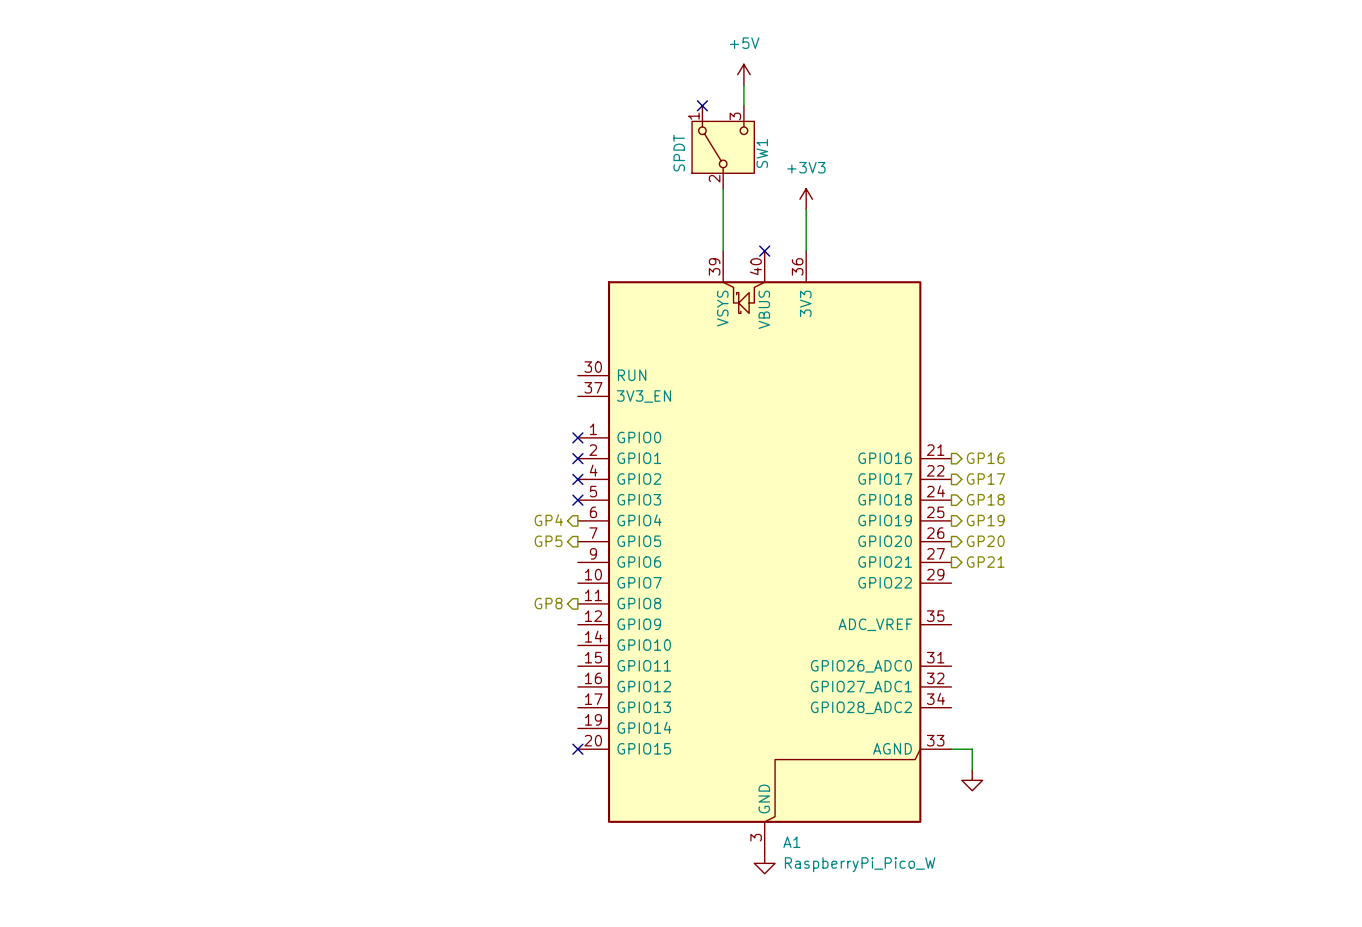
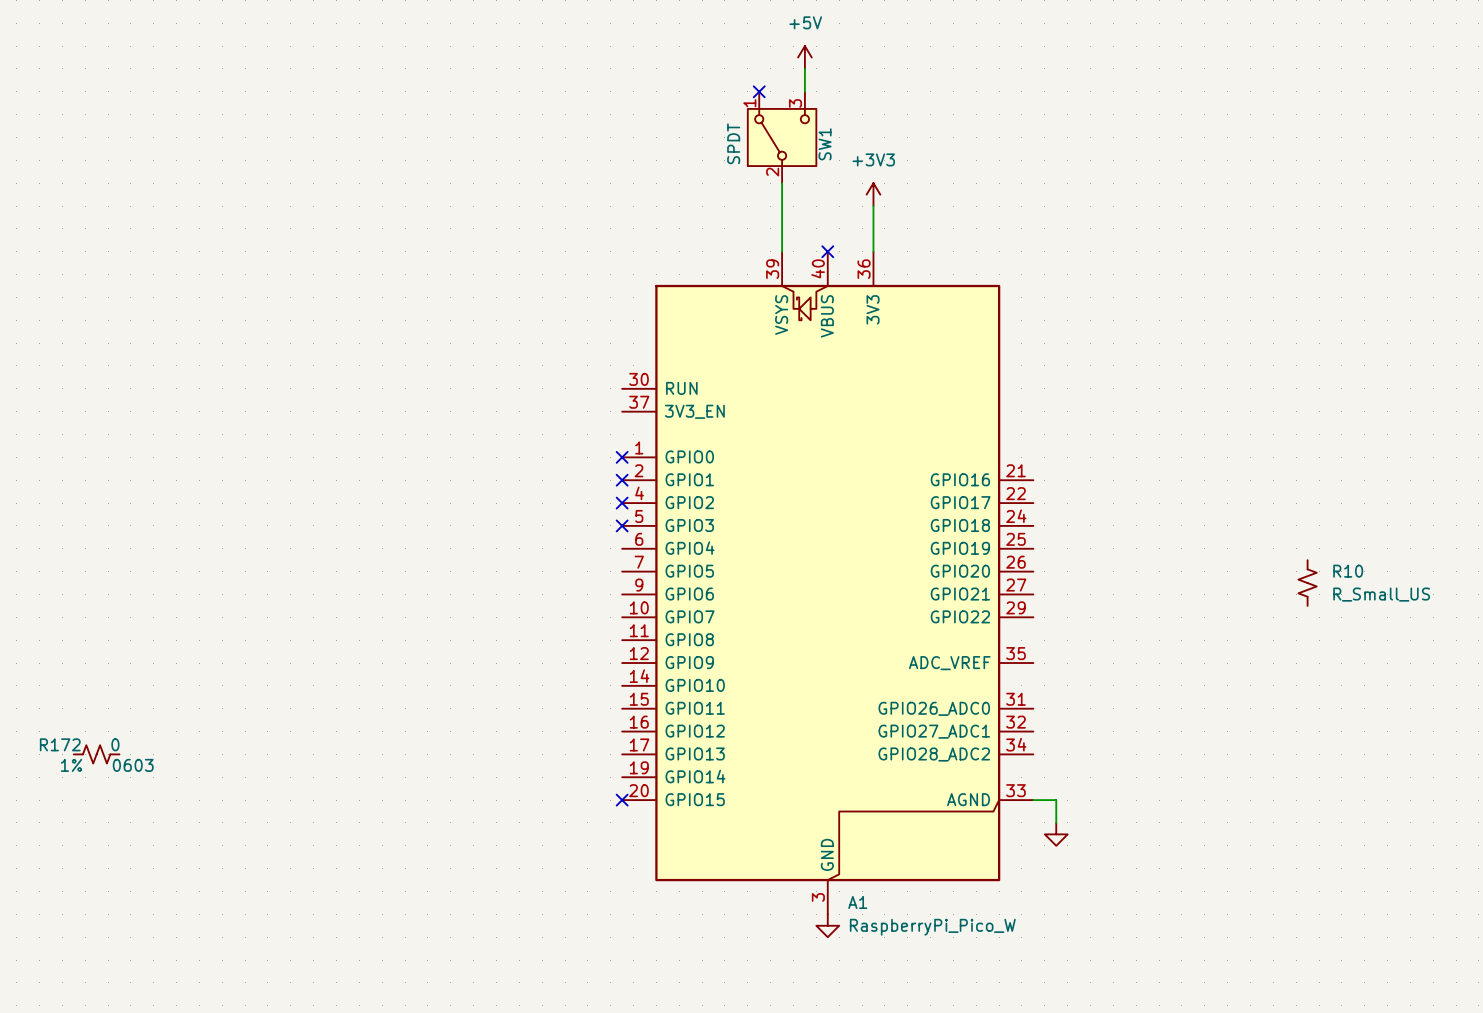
hierarchical label: GP16 (985, 458) -> none
hierarchical label: GP17 (985, 479) -> none
hierarchical label: GP18 (985, 499) -> none
hierarchical label: GP4 (548, 520) -> none
hierarchical label: GP19 (985, 520) -> none
hierarchical label: GP5 (548, 541) -> none
hierarchical label: GP20 (985, 541) -> none
R10: none -> R_Small_US (1307, 583)
hierarchical label: GP21 (985, 562) -> none
hierarchical label: GP8 (548, 603) -> none
R172: none -> 0 (96, 754)

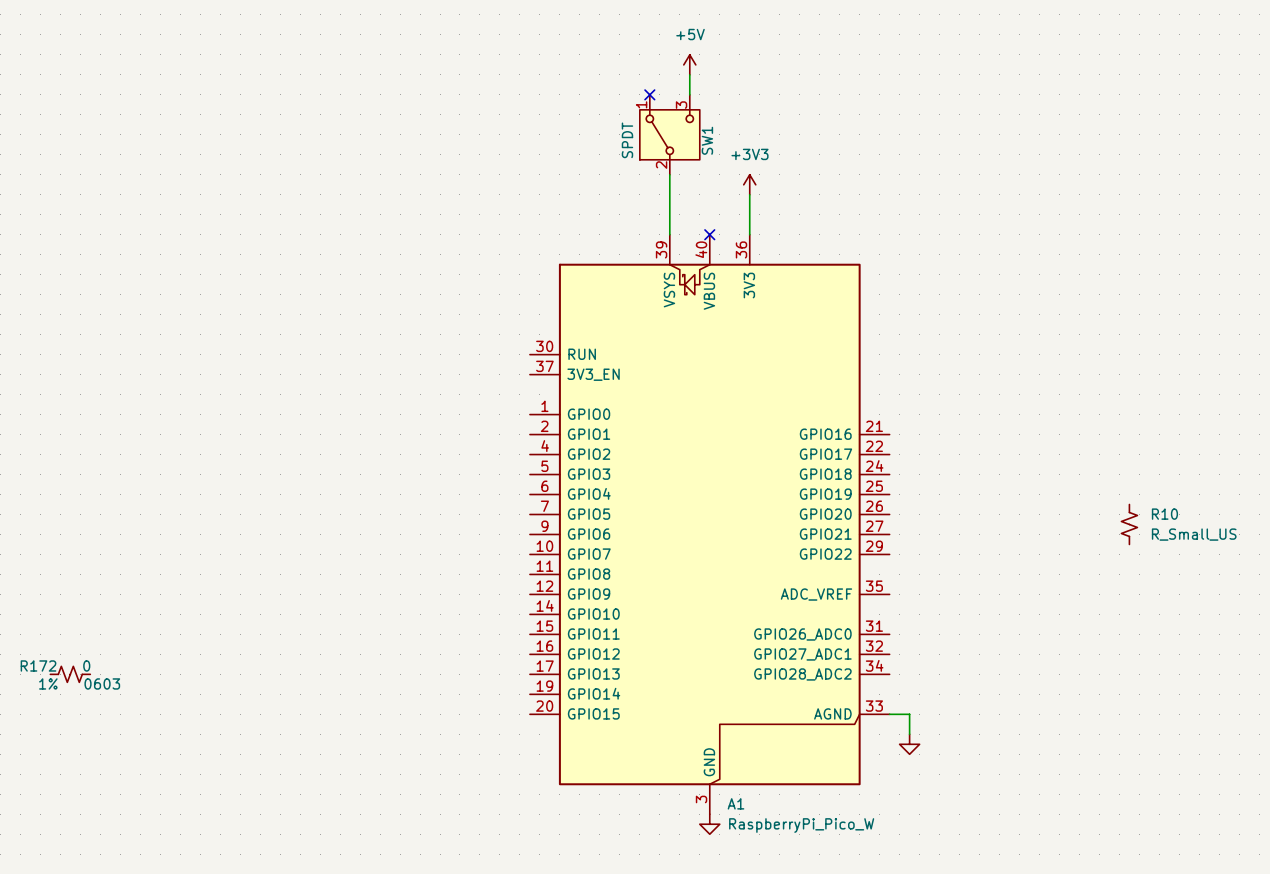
no-connect mark: (622, 457) -> none
no-connect mark: (622, 480) -> none
no-connect mark: (622, 503) -> none
no-connect mark: (622, 525) -> none
no-connect mark: (622, 800) -> none

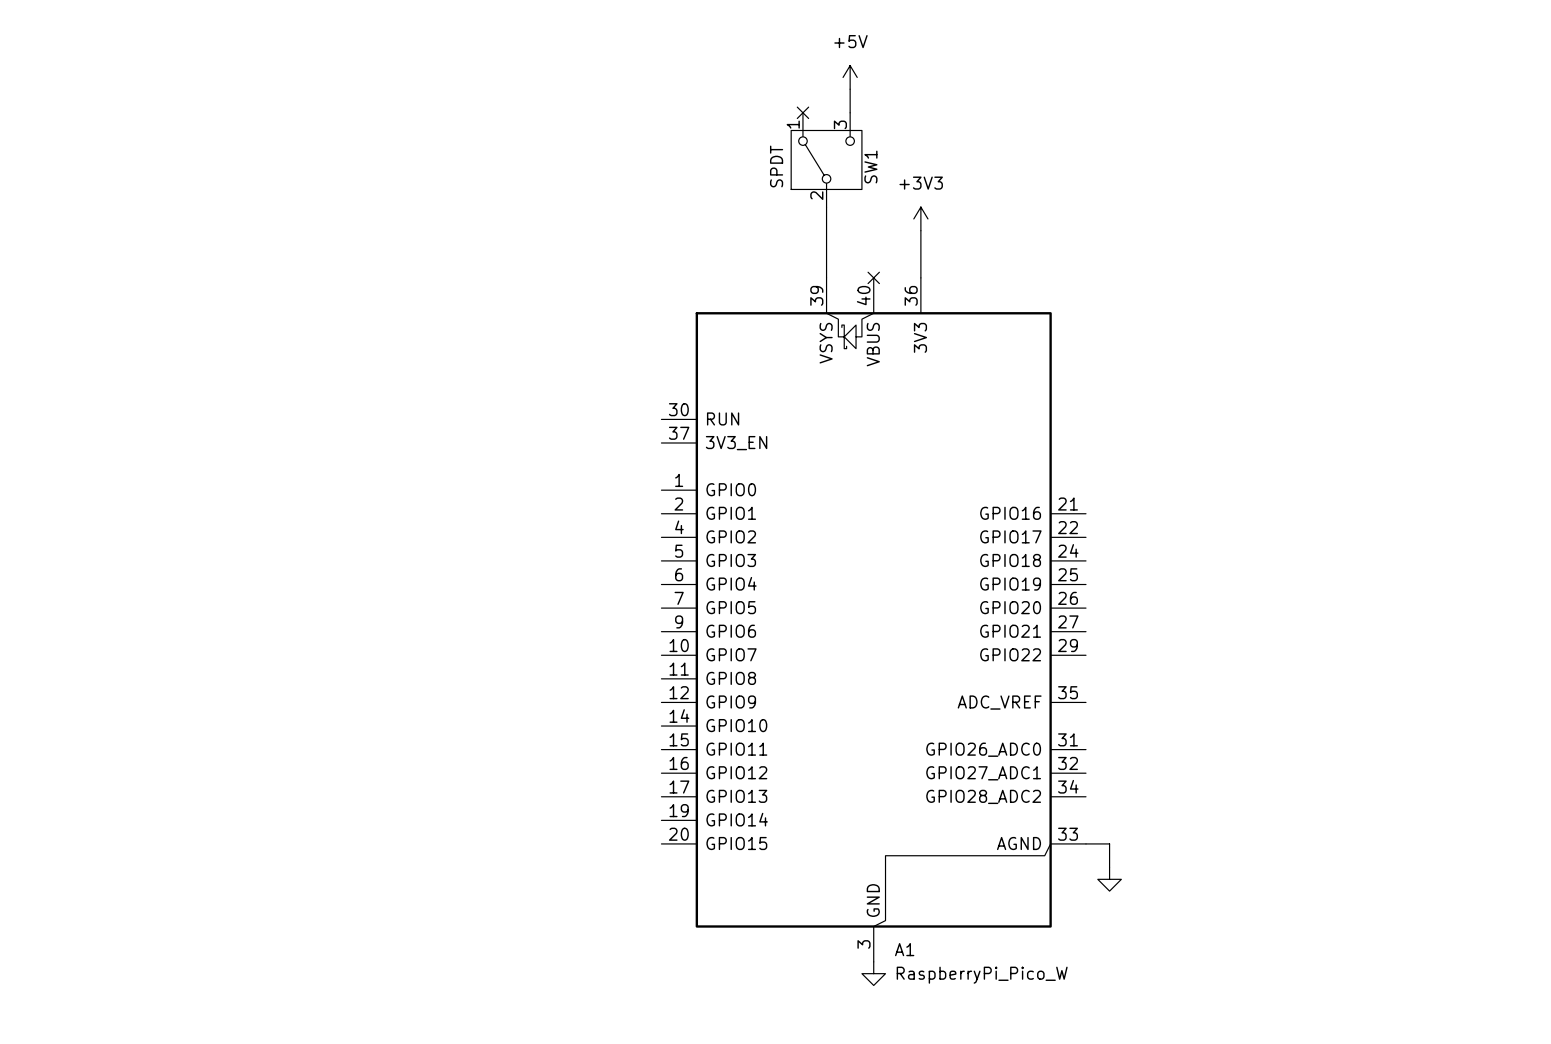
R10: R_Small_US (1129, 524) -> none
R172: 0 (70, 674) -> none

